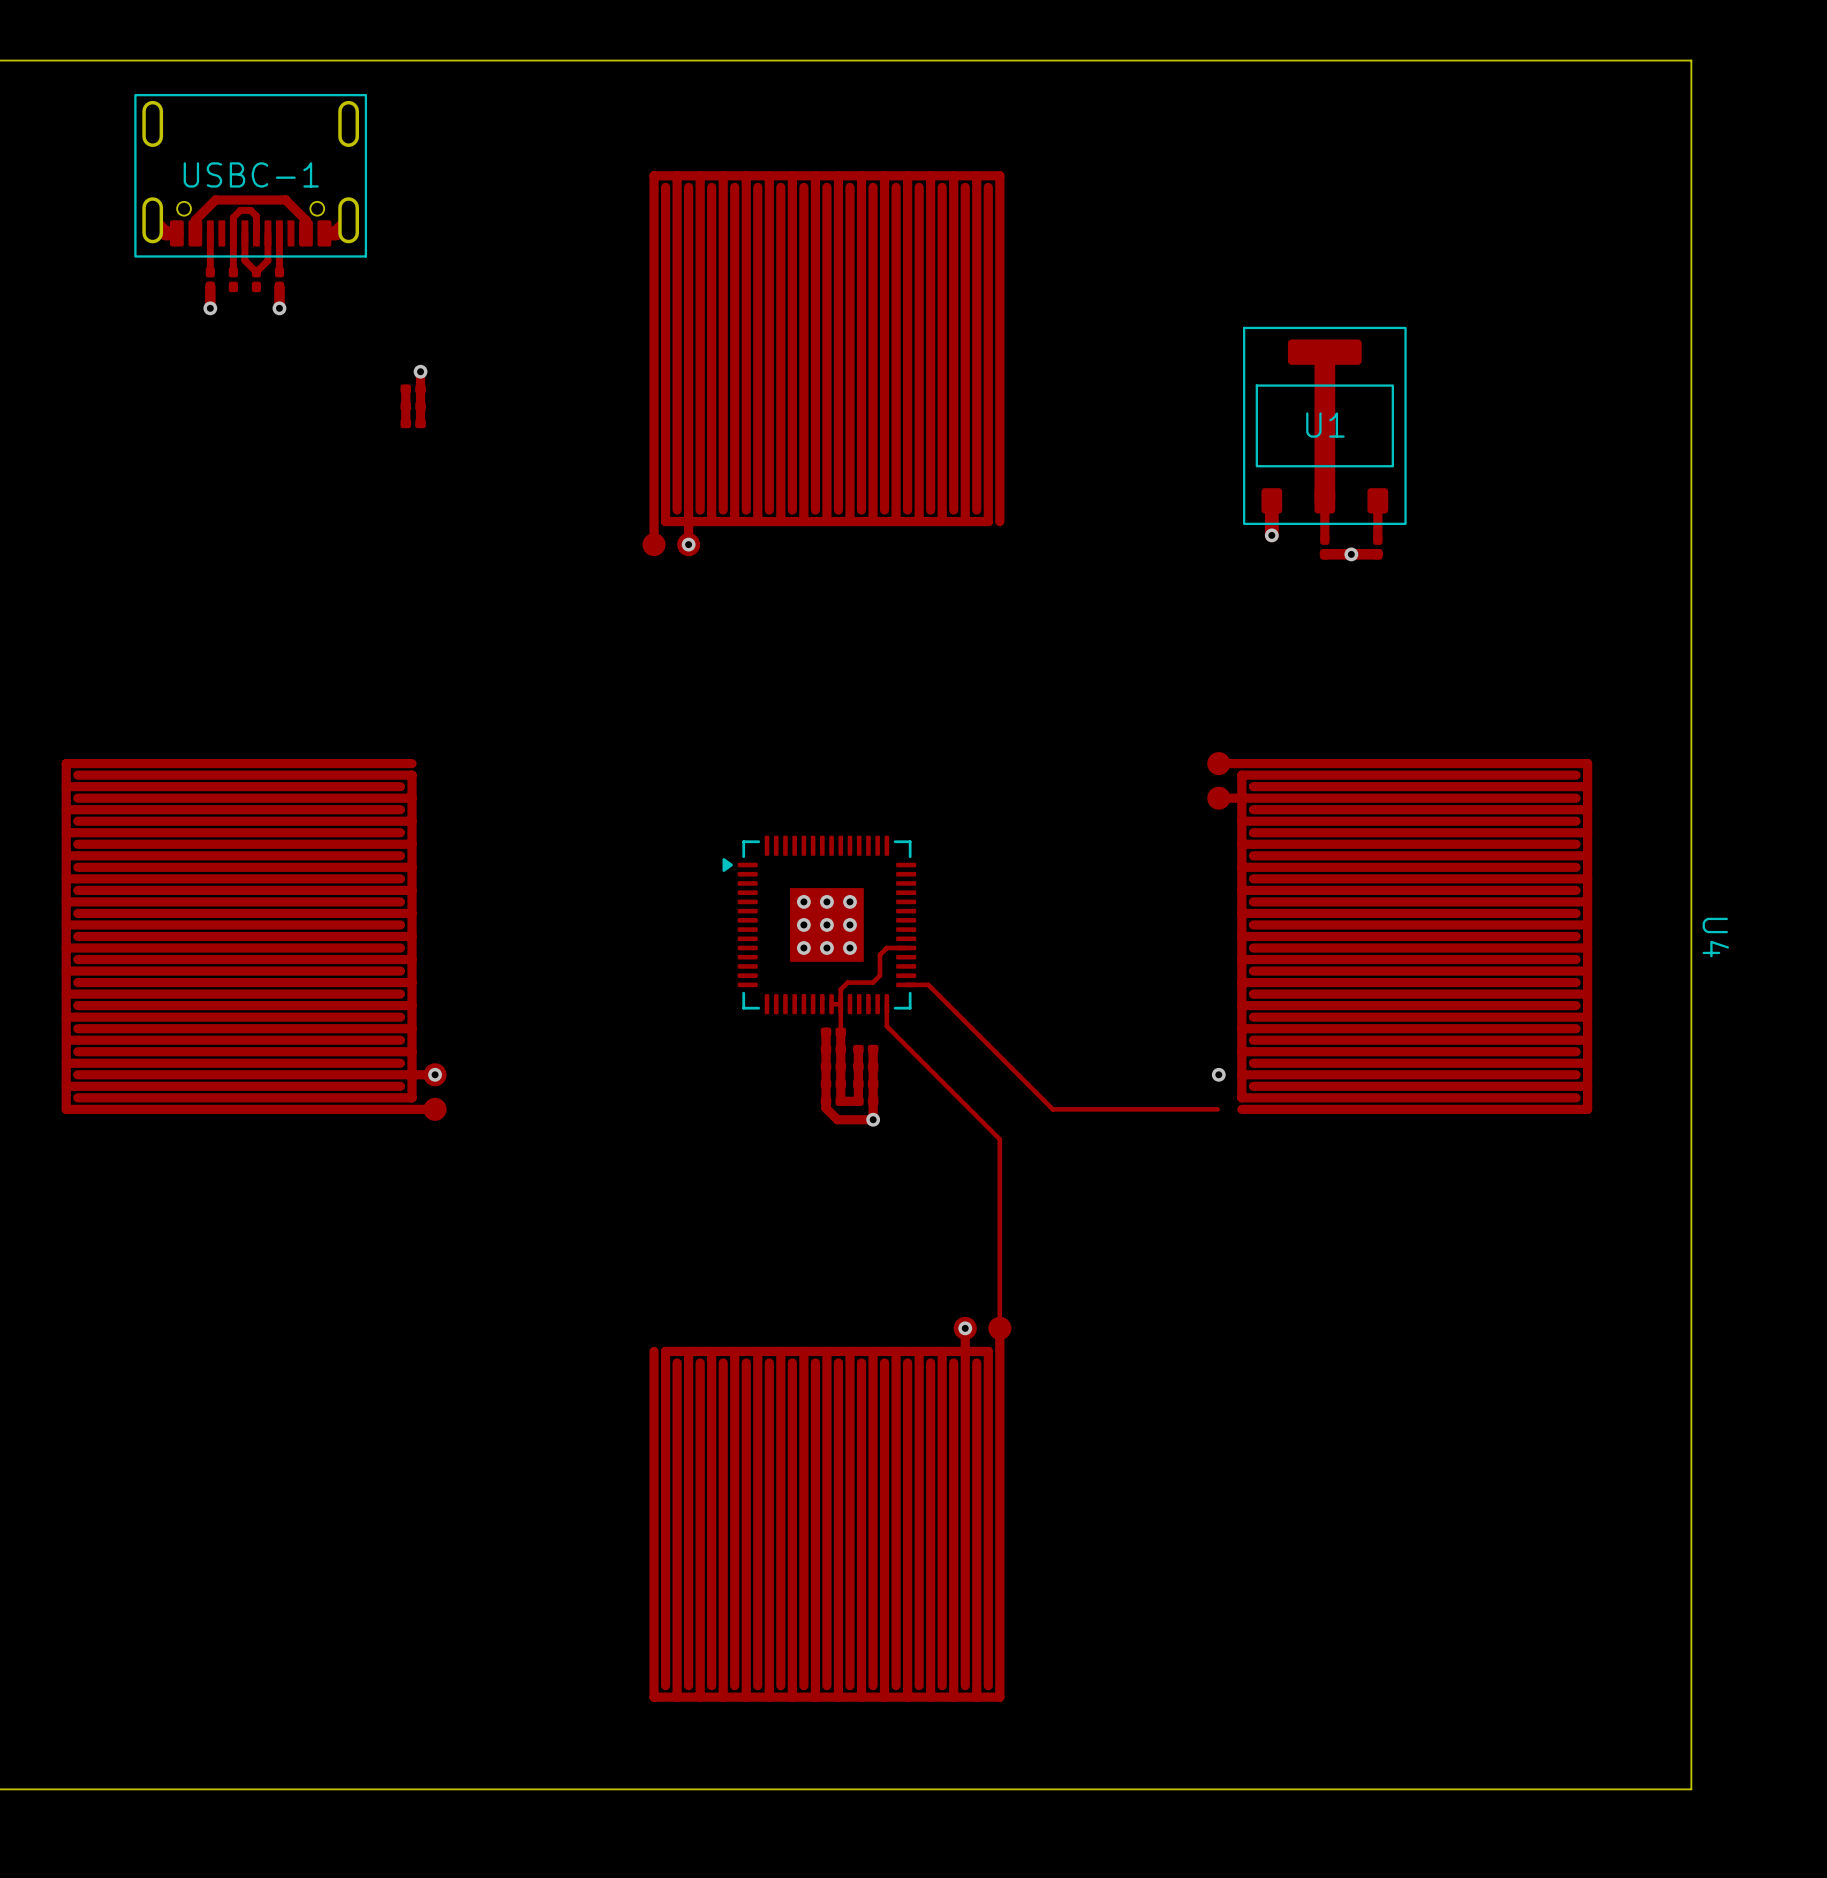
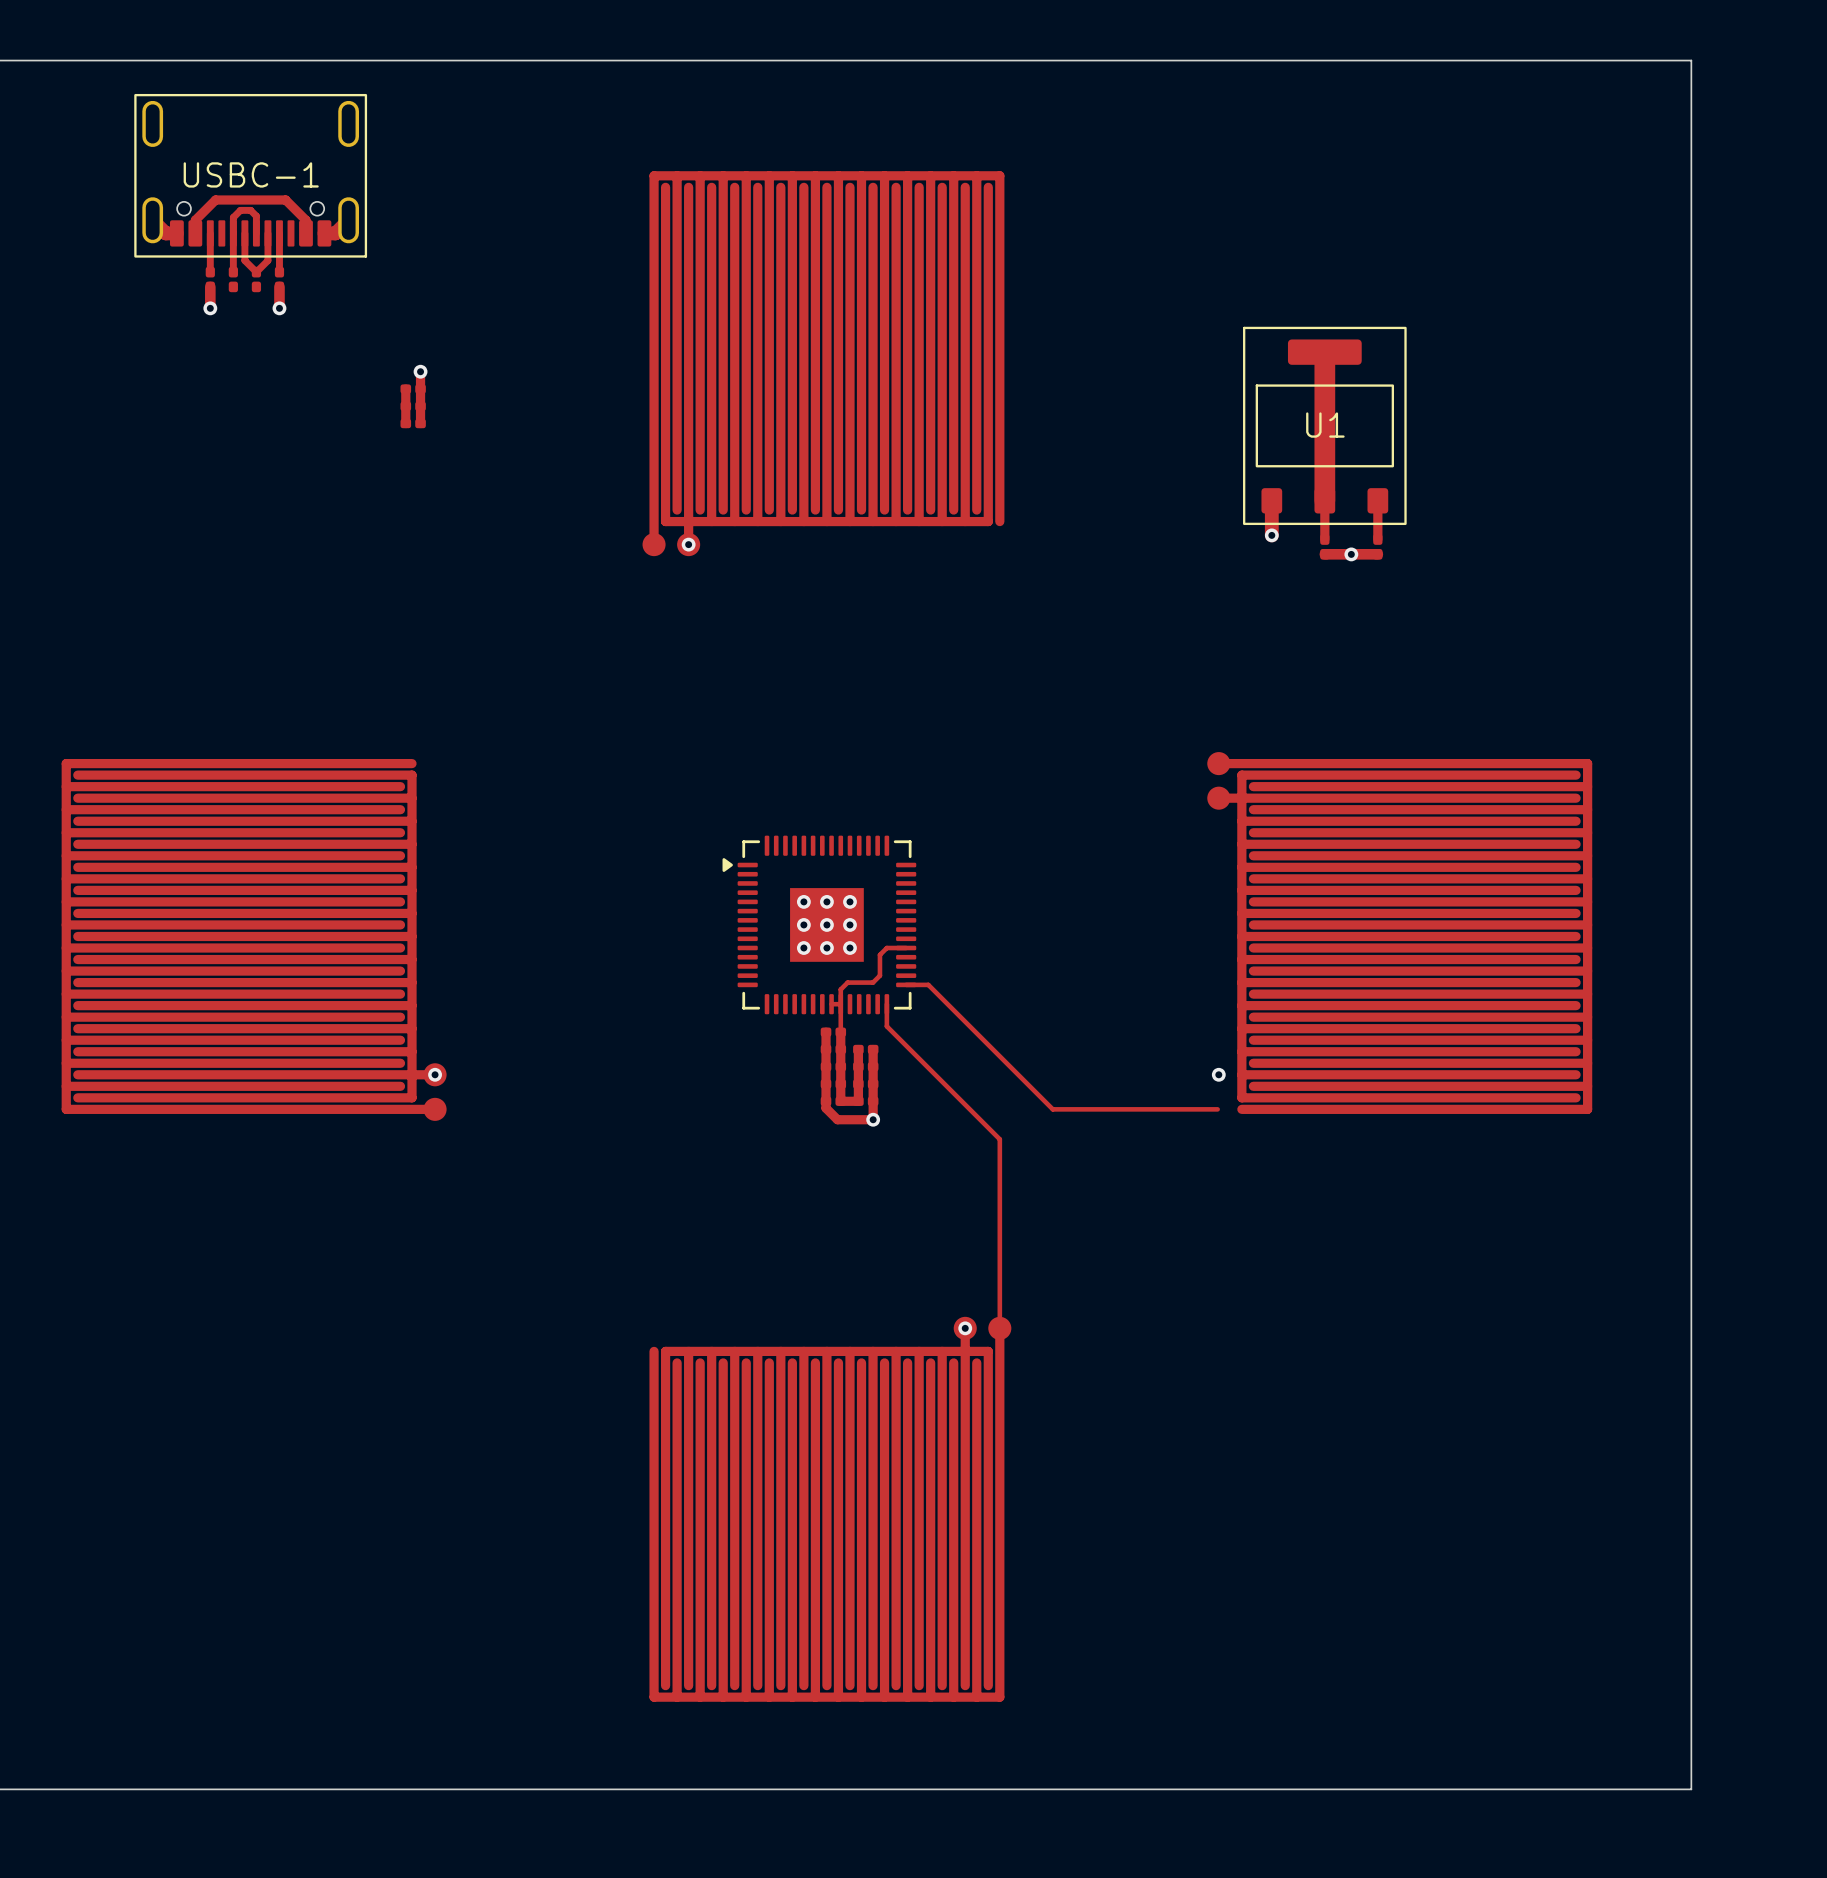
U4 name: U4 (1715, 937) -> none

